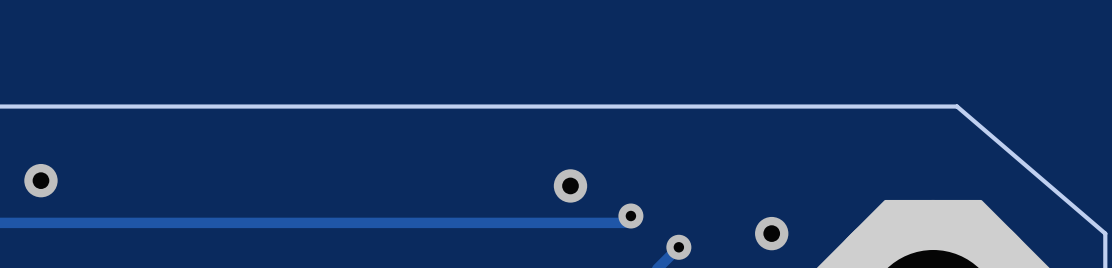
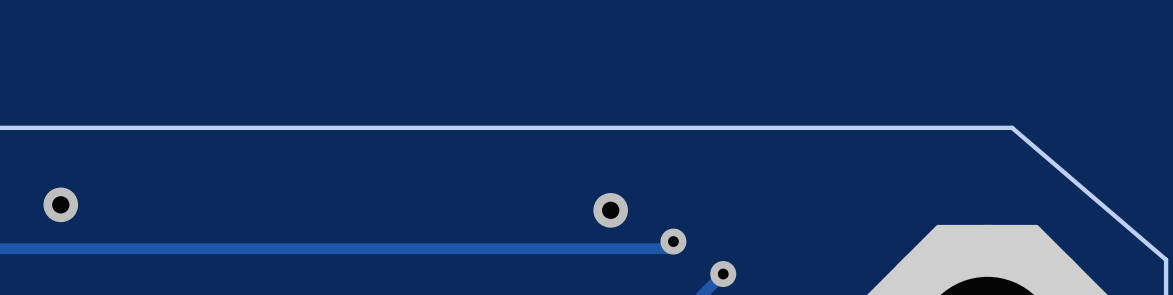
via: (771, 233) -> none

